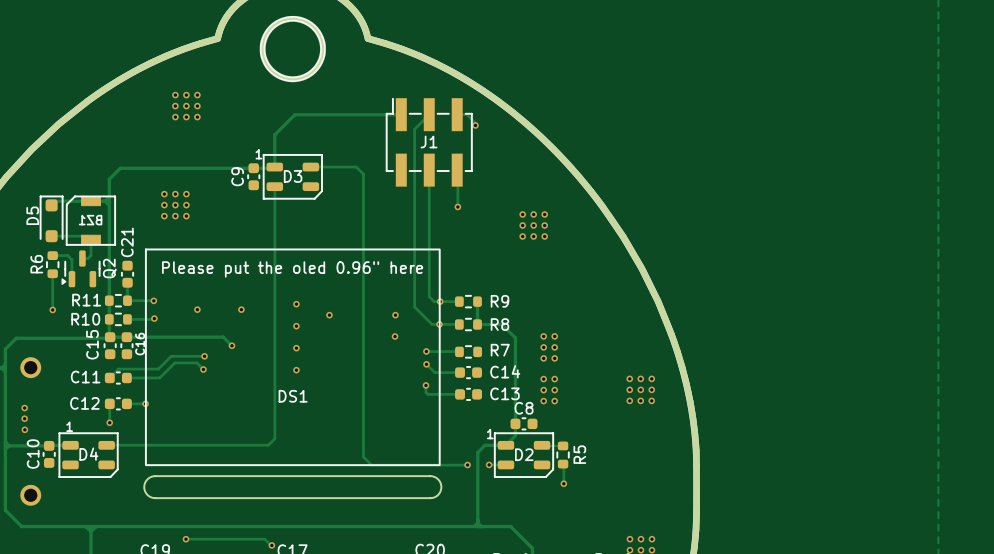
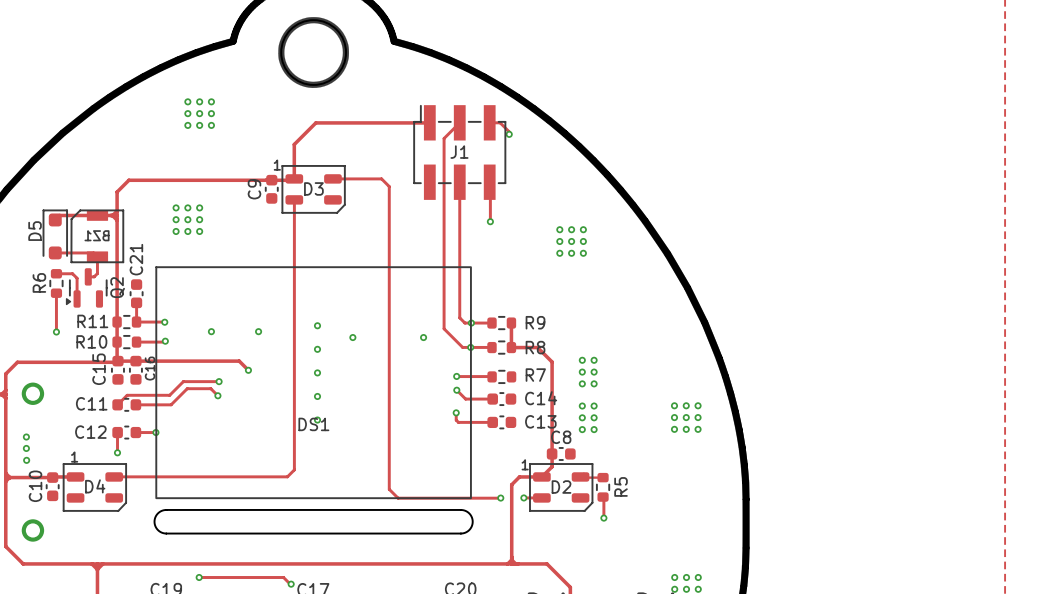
text: Please put the oled 0.96" here (292, 269) -> none
via: (395, 336) -> none
via: none -> (317, 420)

